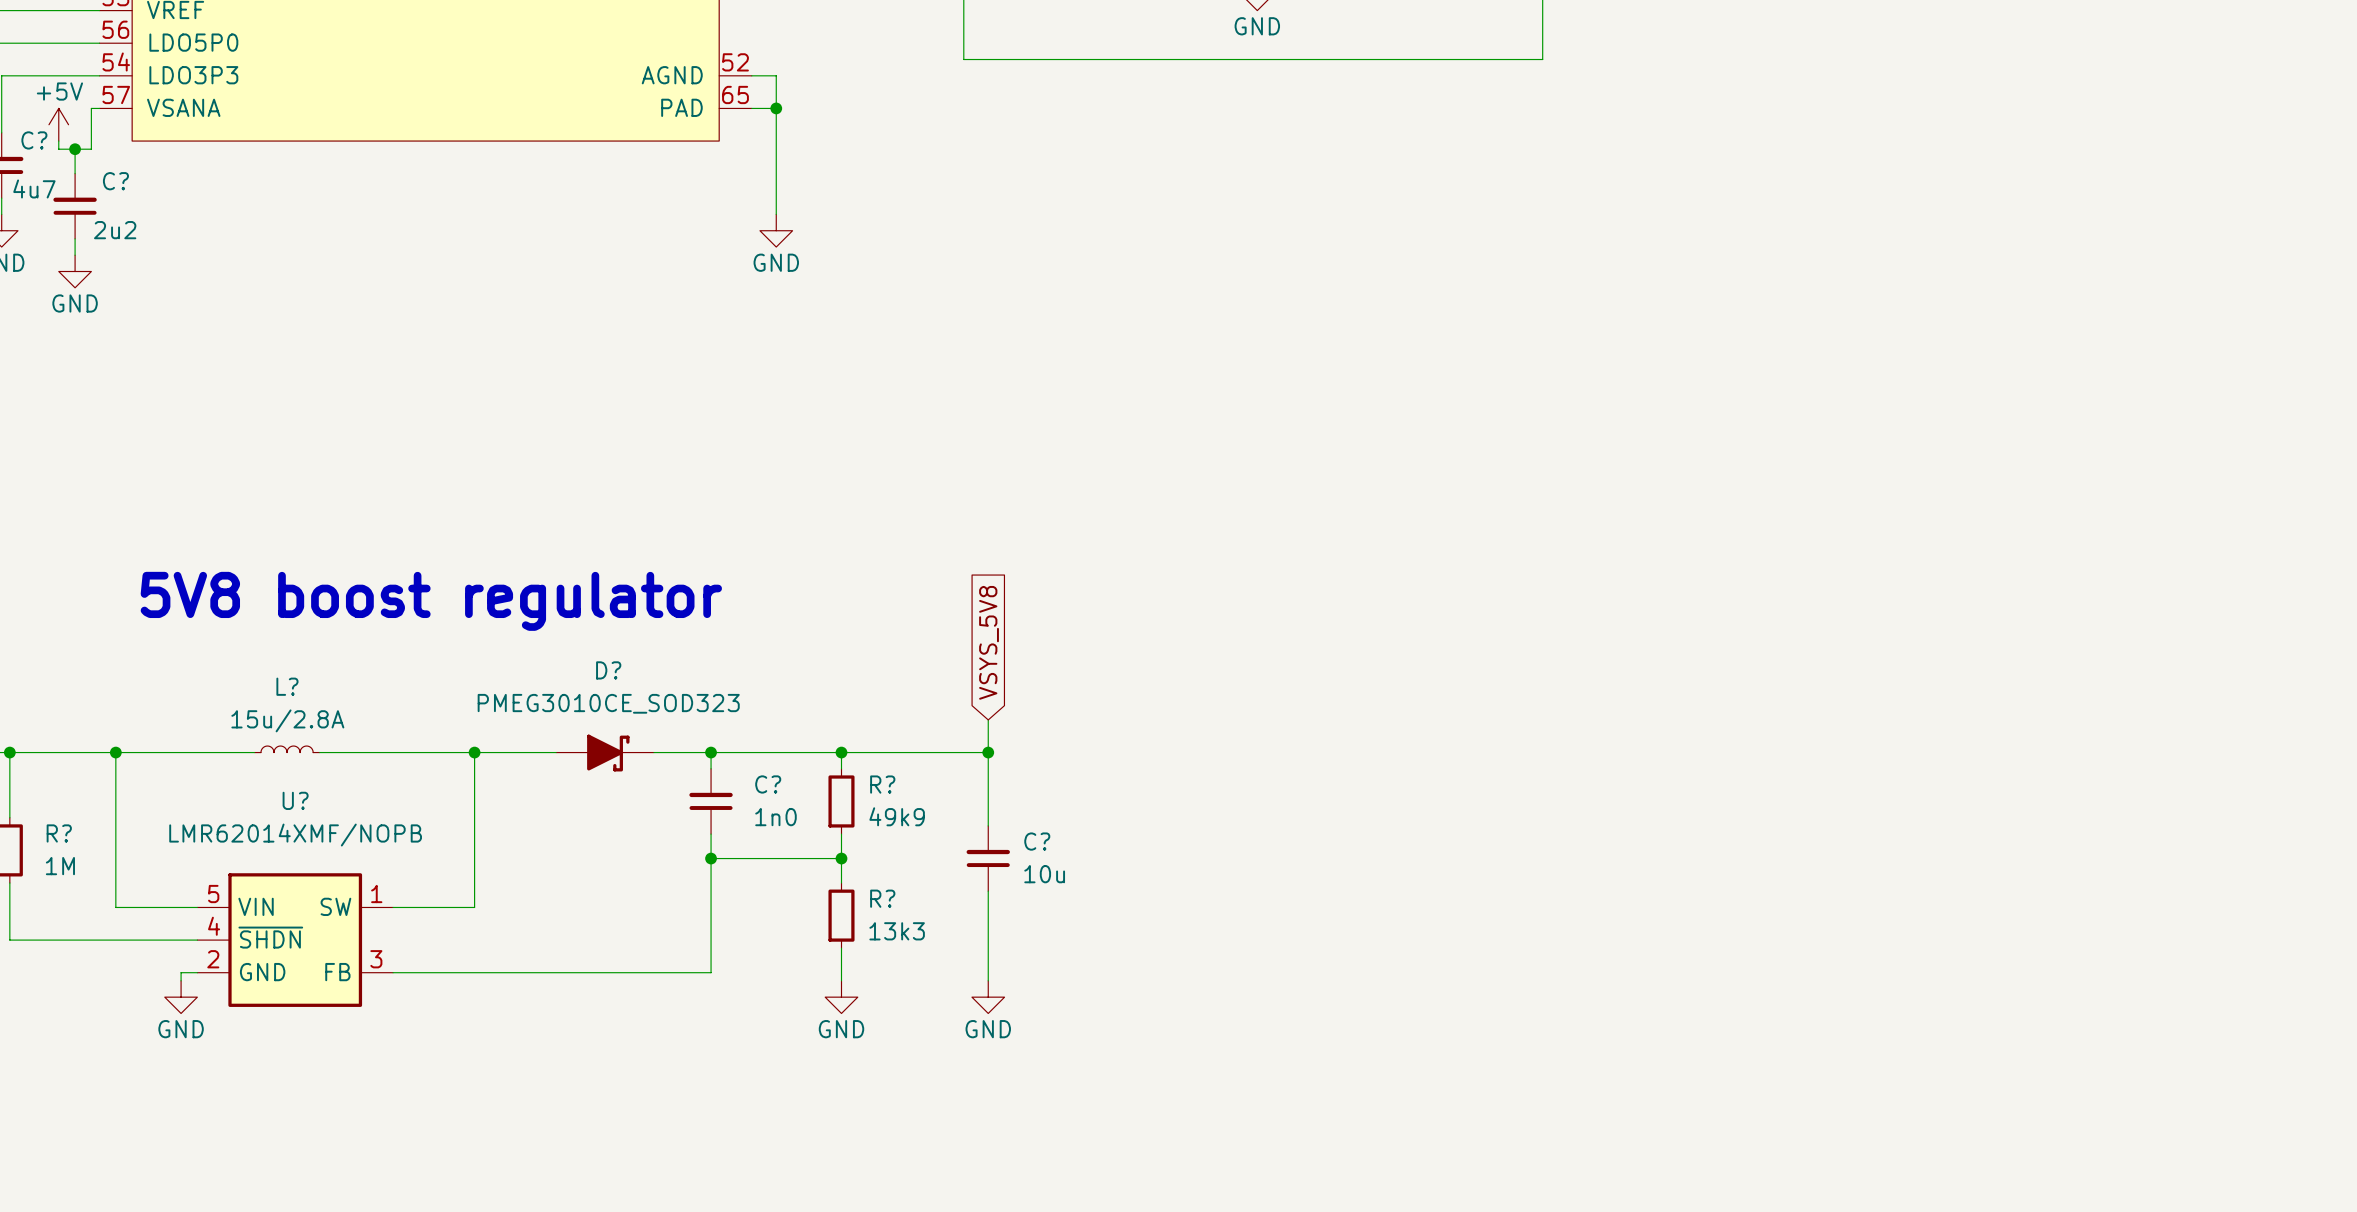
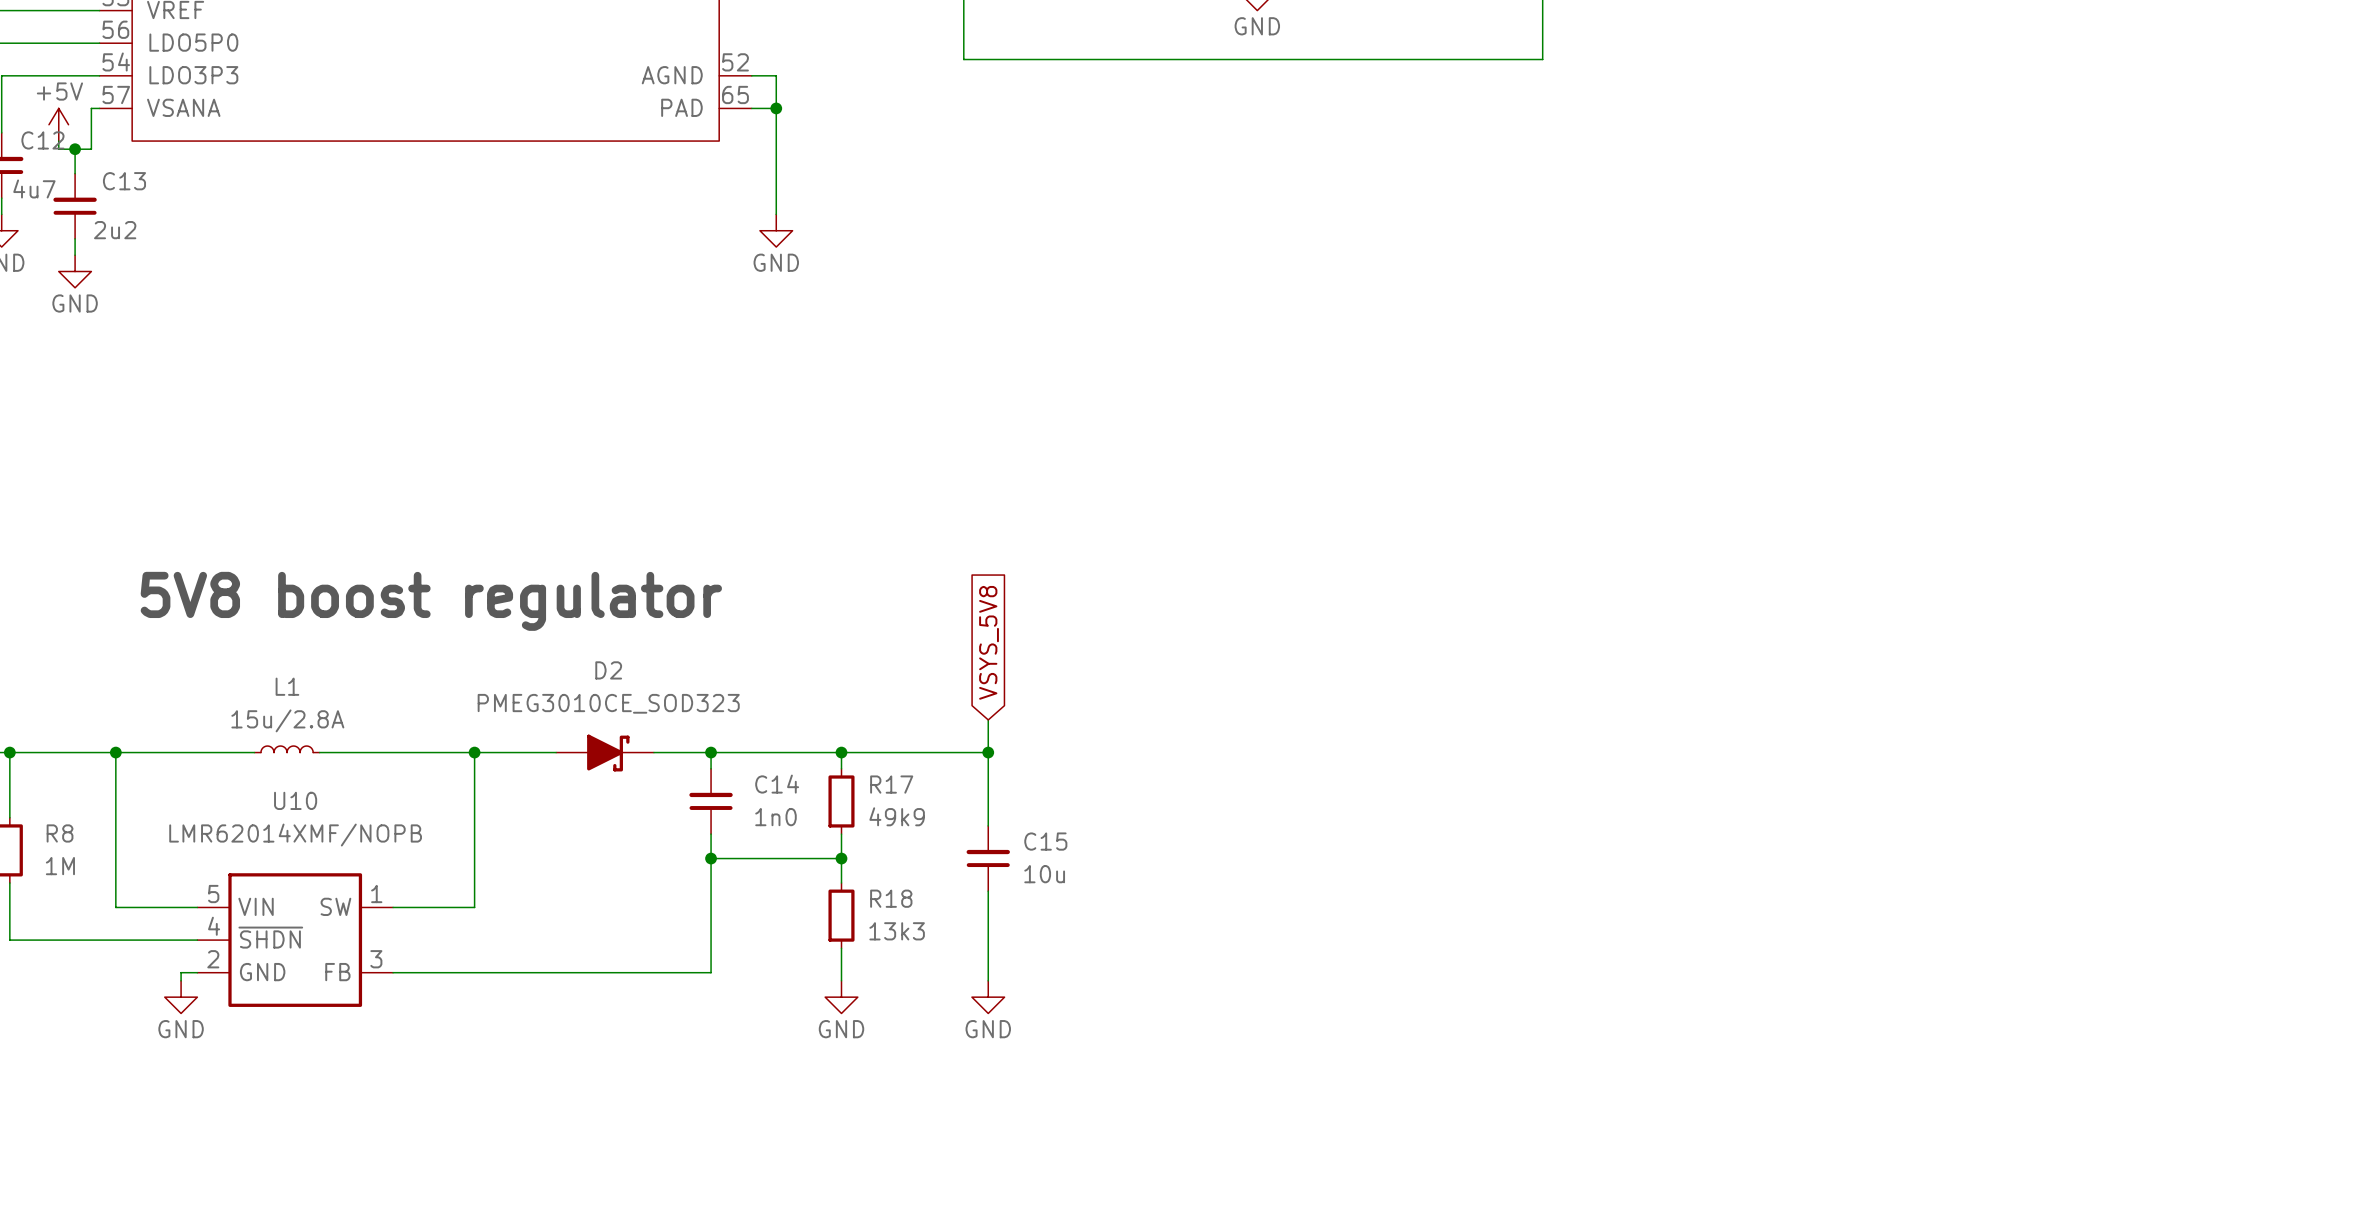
C? name: C? (34, 140) -> C12 (42, 140)
C? name: C? (115, 181) -> C13 (124, 181)
D? name: D? (608, 670) -> D2 (608, 670)
L? name: L? (287, 686) -> L1 (287, 686)
C? name: C? (768, 784) -> C14 (777, 784)
R? name: R? (882, 784) -> R17 (891, 784)
U? name: U? (295, 800) -> U10 (295, 800)
R? name: R? (59, 833) -> R8 (60, 833)
C? name: C? (1037, 841) -> C15 (1045, 841)
R? name: R? (882, 898) -> R18 (891, 898)

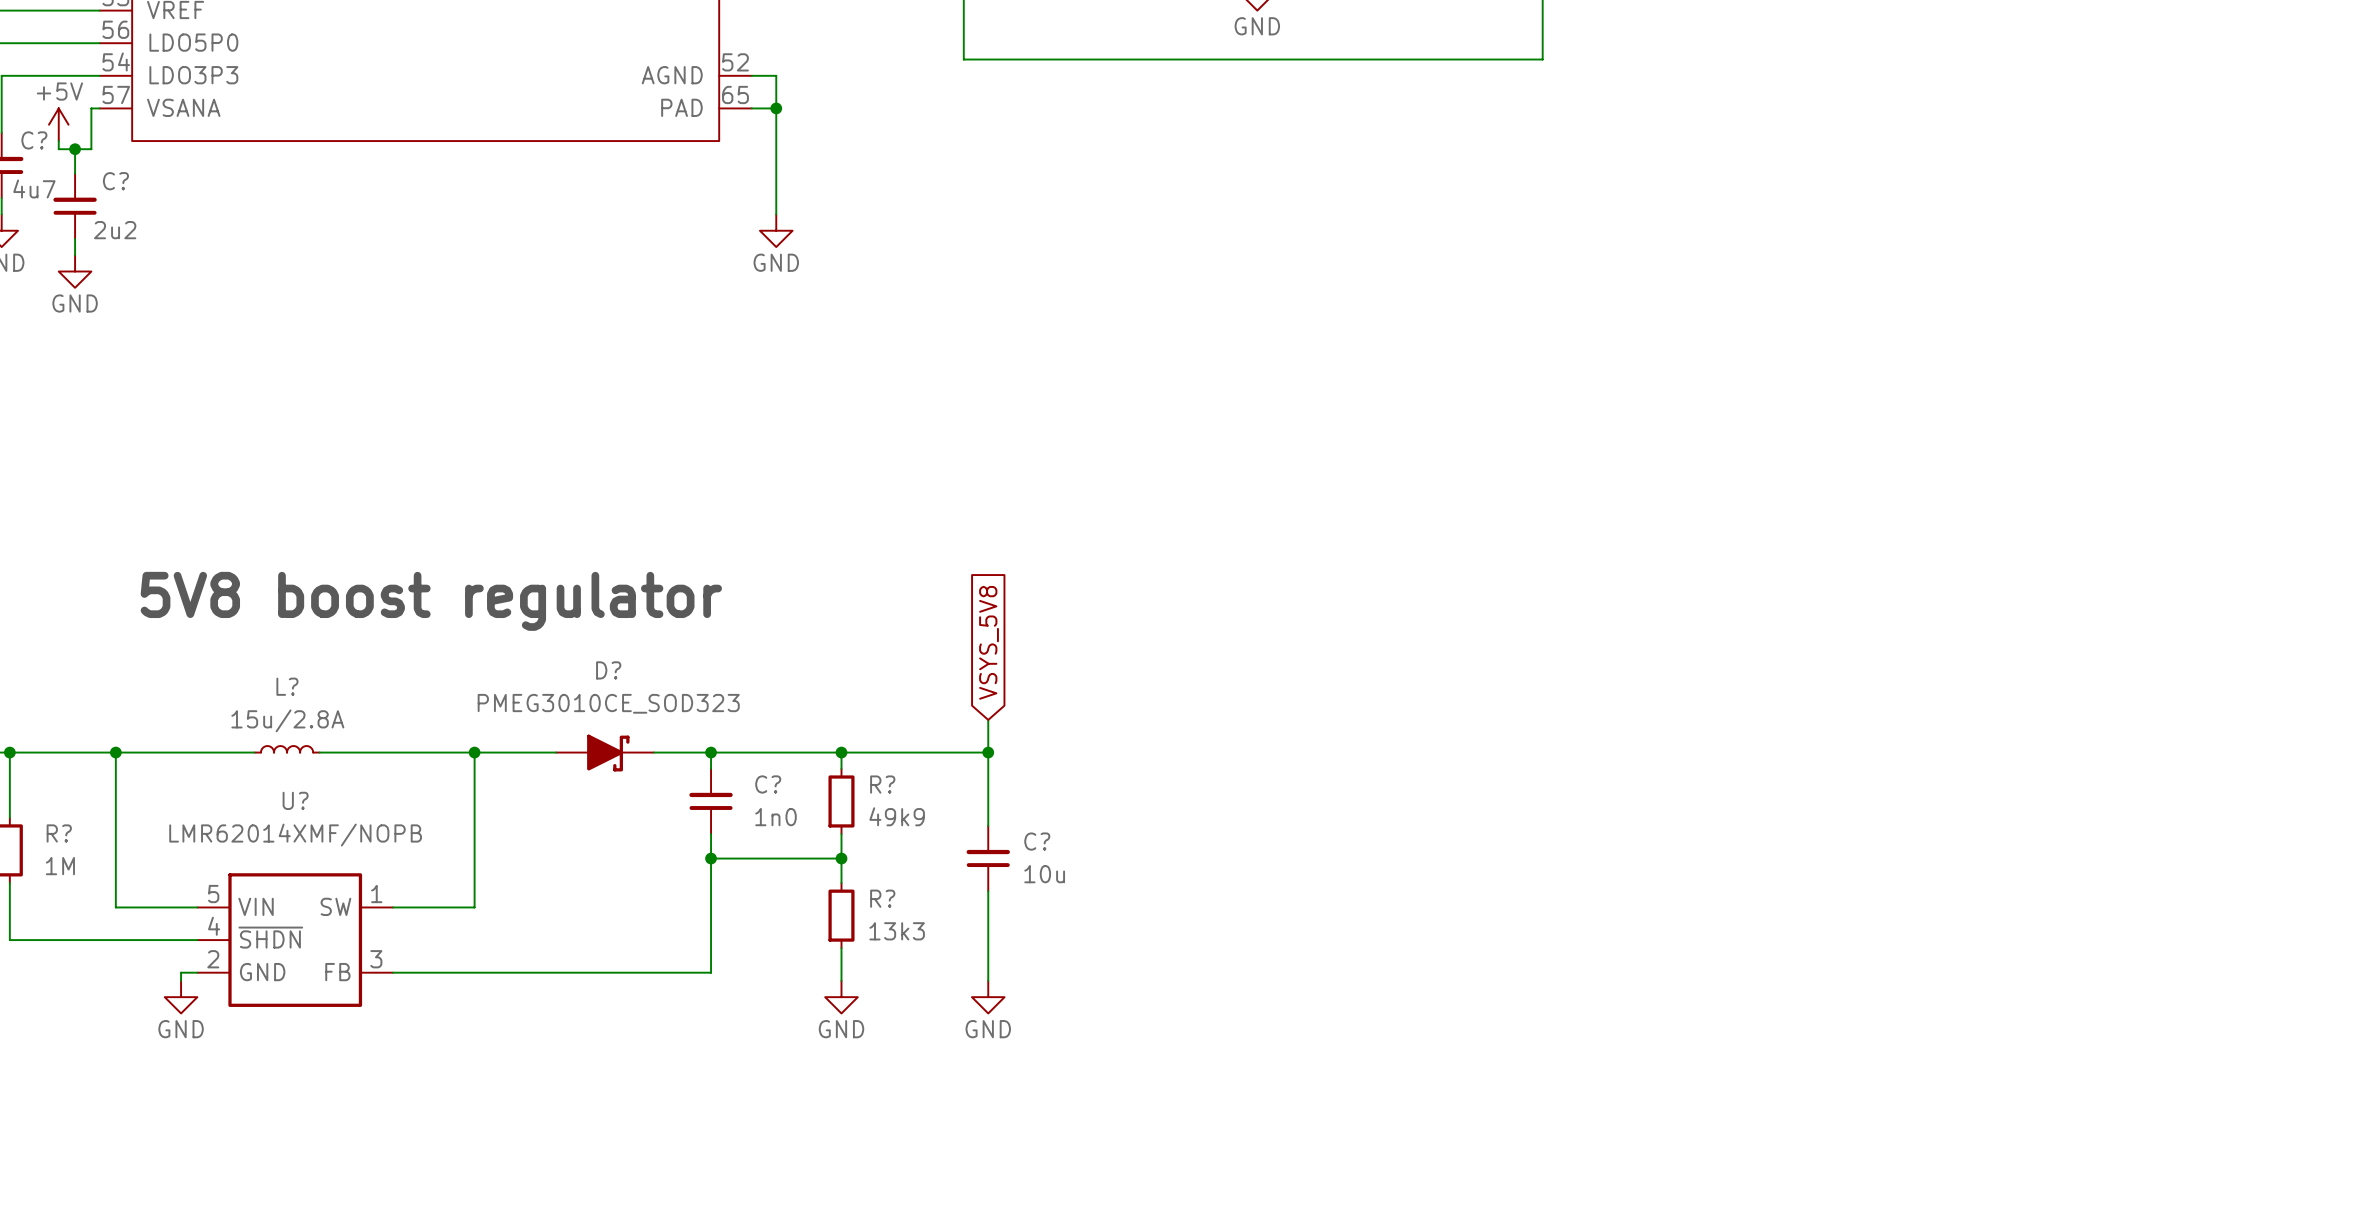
C12 name: C12 (42, 140) -> C? (34, 140)
C13 name: C13 (124, 181) -> C? (115, 181)
D2 name: D2 (608, 670) -> D? (608, 670)
L1 name: L1 (287, 686) -> L? (287, 686)
C14 name: C14 (777, 784) -> C? (768, 784)
R17 name: R17 (891, 784) -> R? (882, 784)
U10 name: U10 (295, 800) -> U? (295, 800)
R8 name: R8 (60, 833) -> R? (59, 833)
C15 name: C15 (1045, 841) -> C? (1037, 841)
R18 name: R18 (891, 898) -> R? (882, 898)

